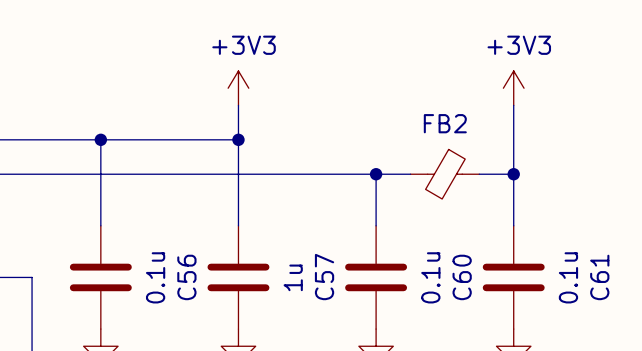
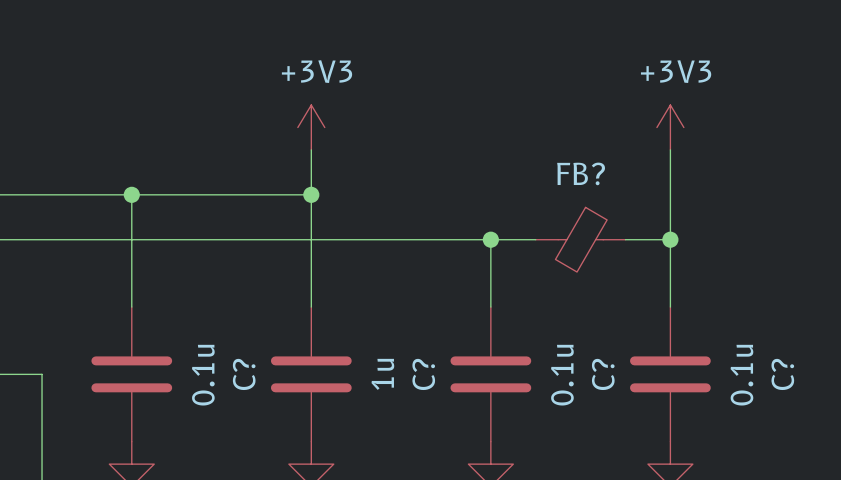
FB2 name: FB2 (445, 123) -> FB? (581, 173)
C56 name: C56 (186, 277) -> C? (244, 374)
C57 name: C57 (324, 277) -> C? (423, 374)
C60 name: C60 (462, 277) -> C? (603, 374)
C61 name: C61 (599, 277) -> C? (782, 374)

